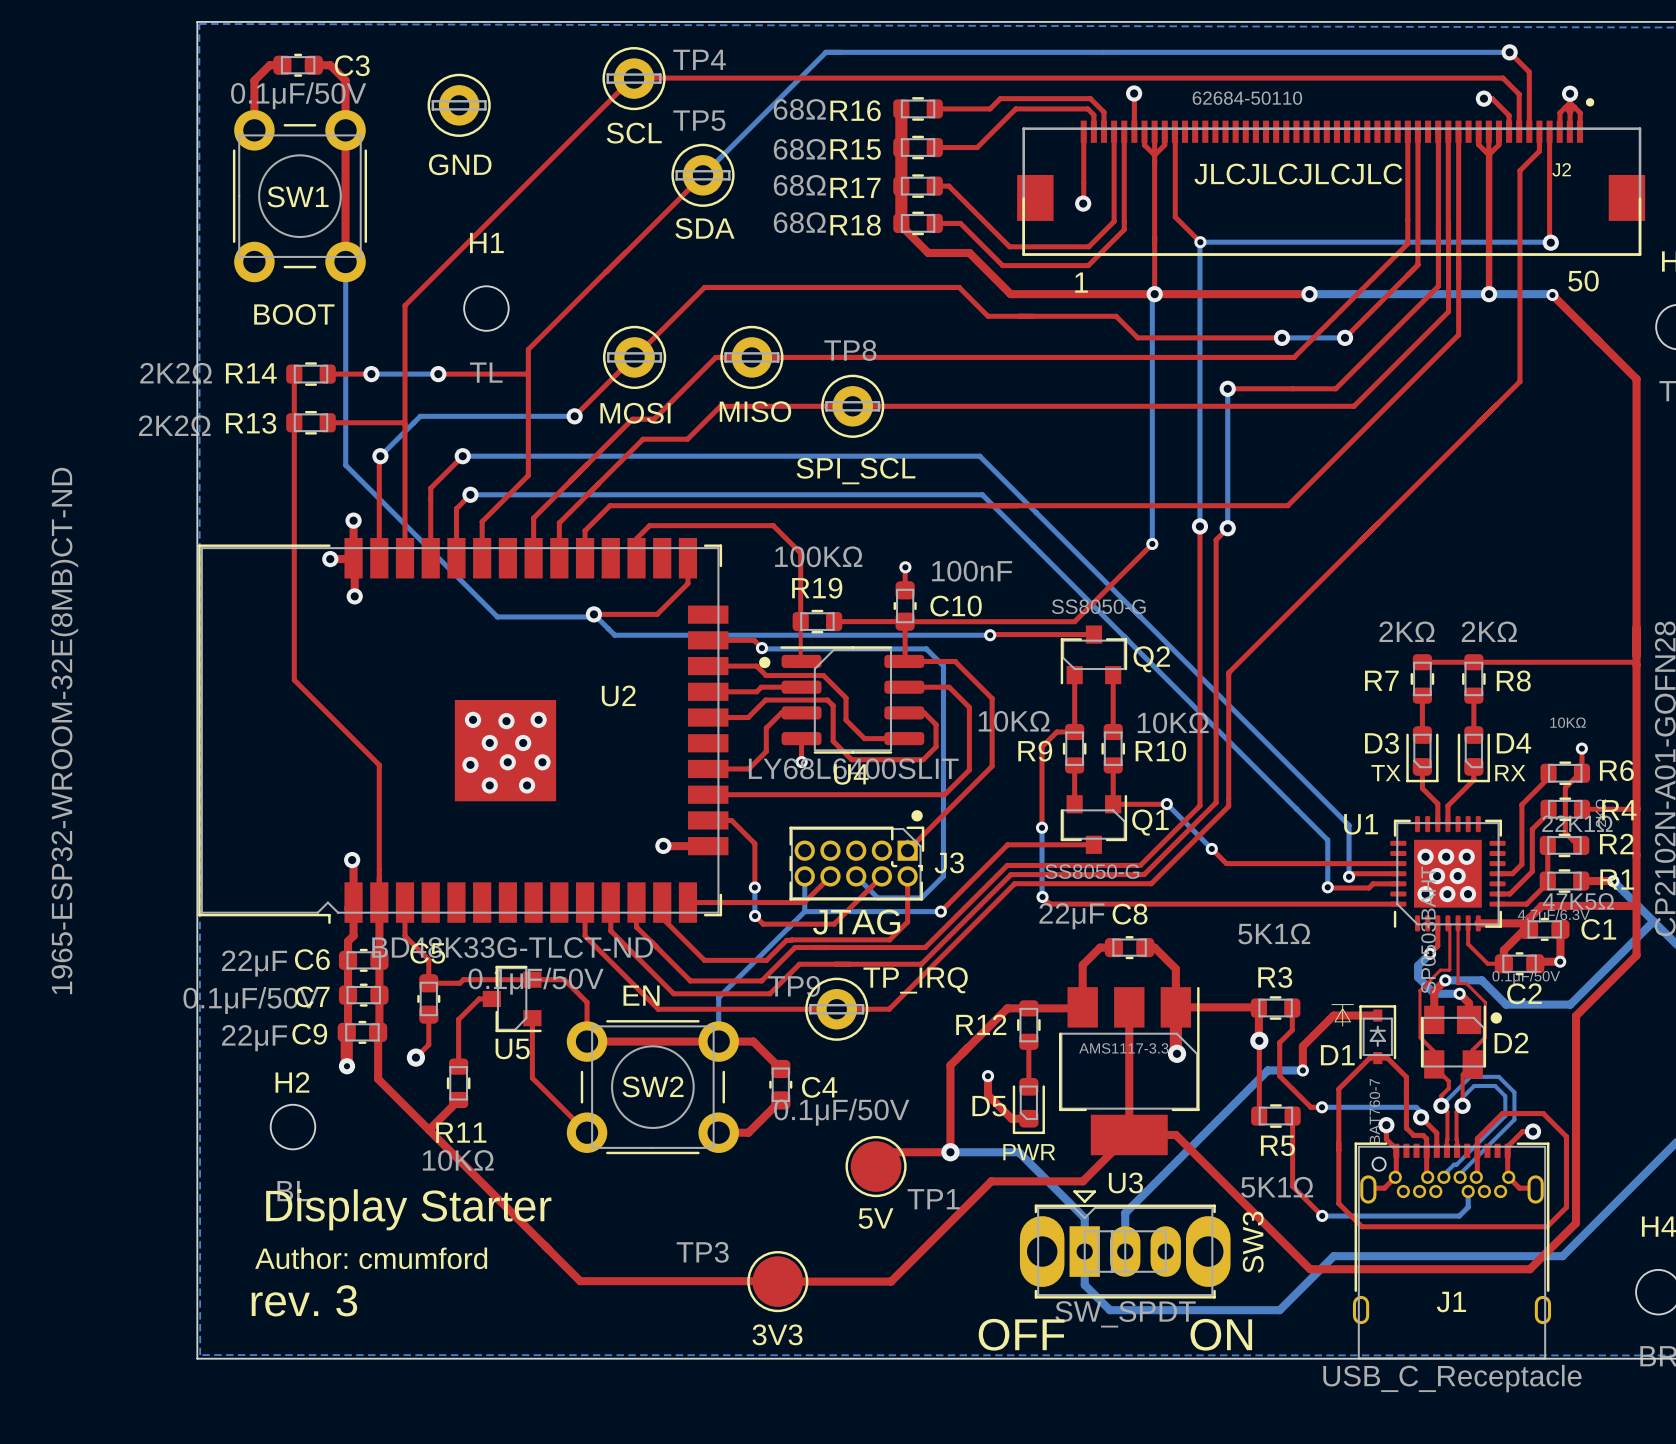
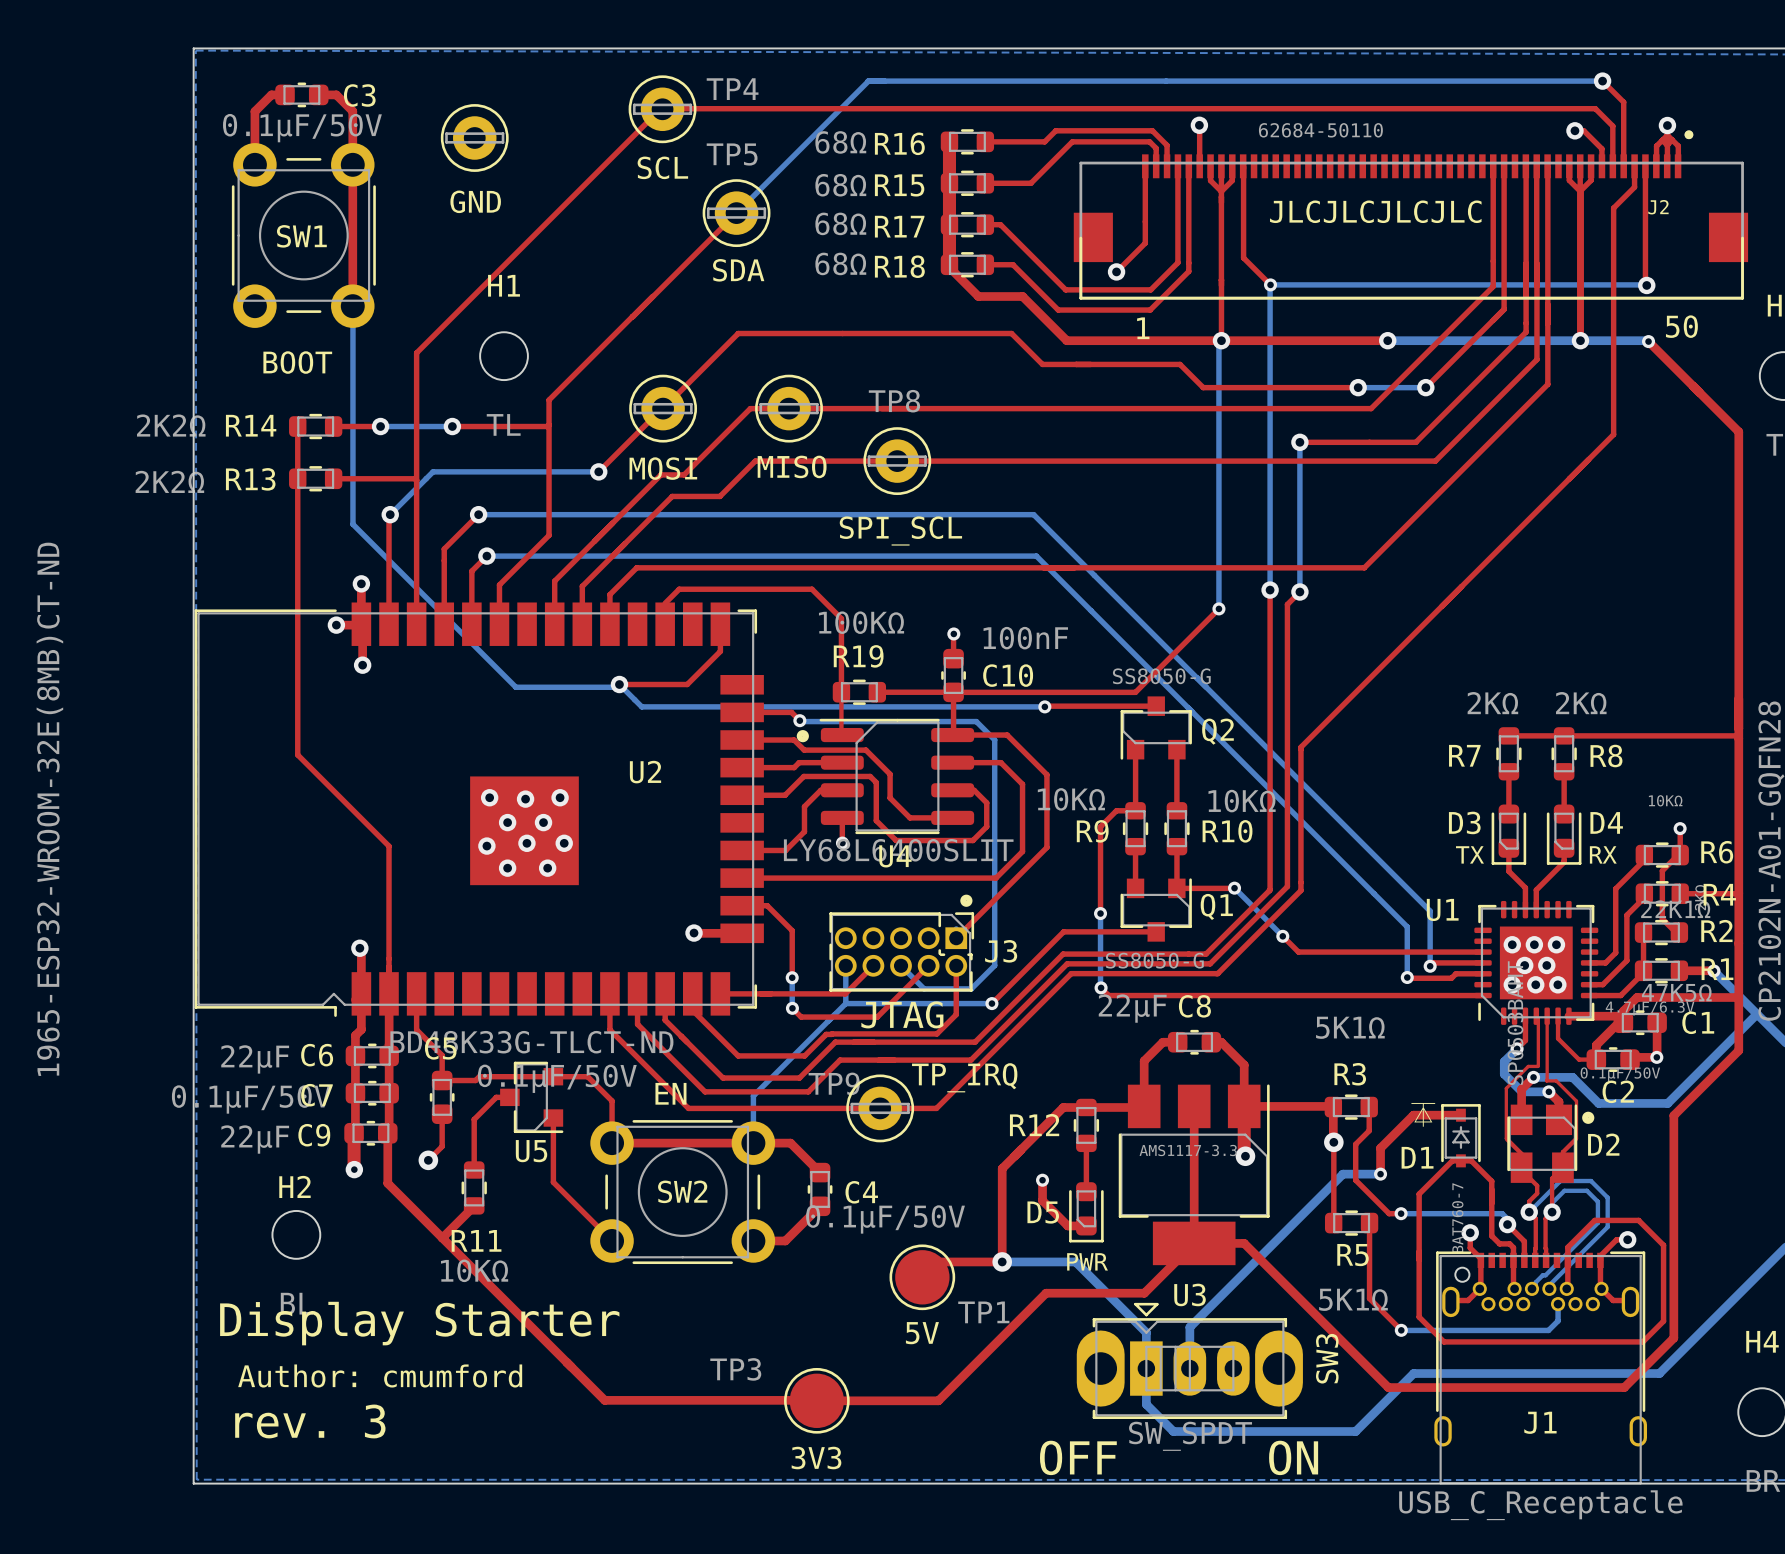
top track: none -> (1145, 243) (1116, 271)
via position: (1083, 203) -> (1116, 271)

